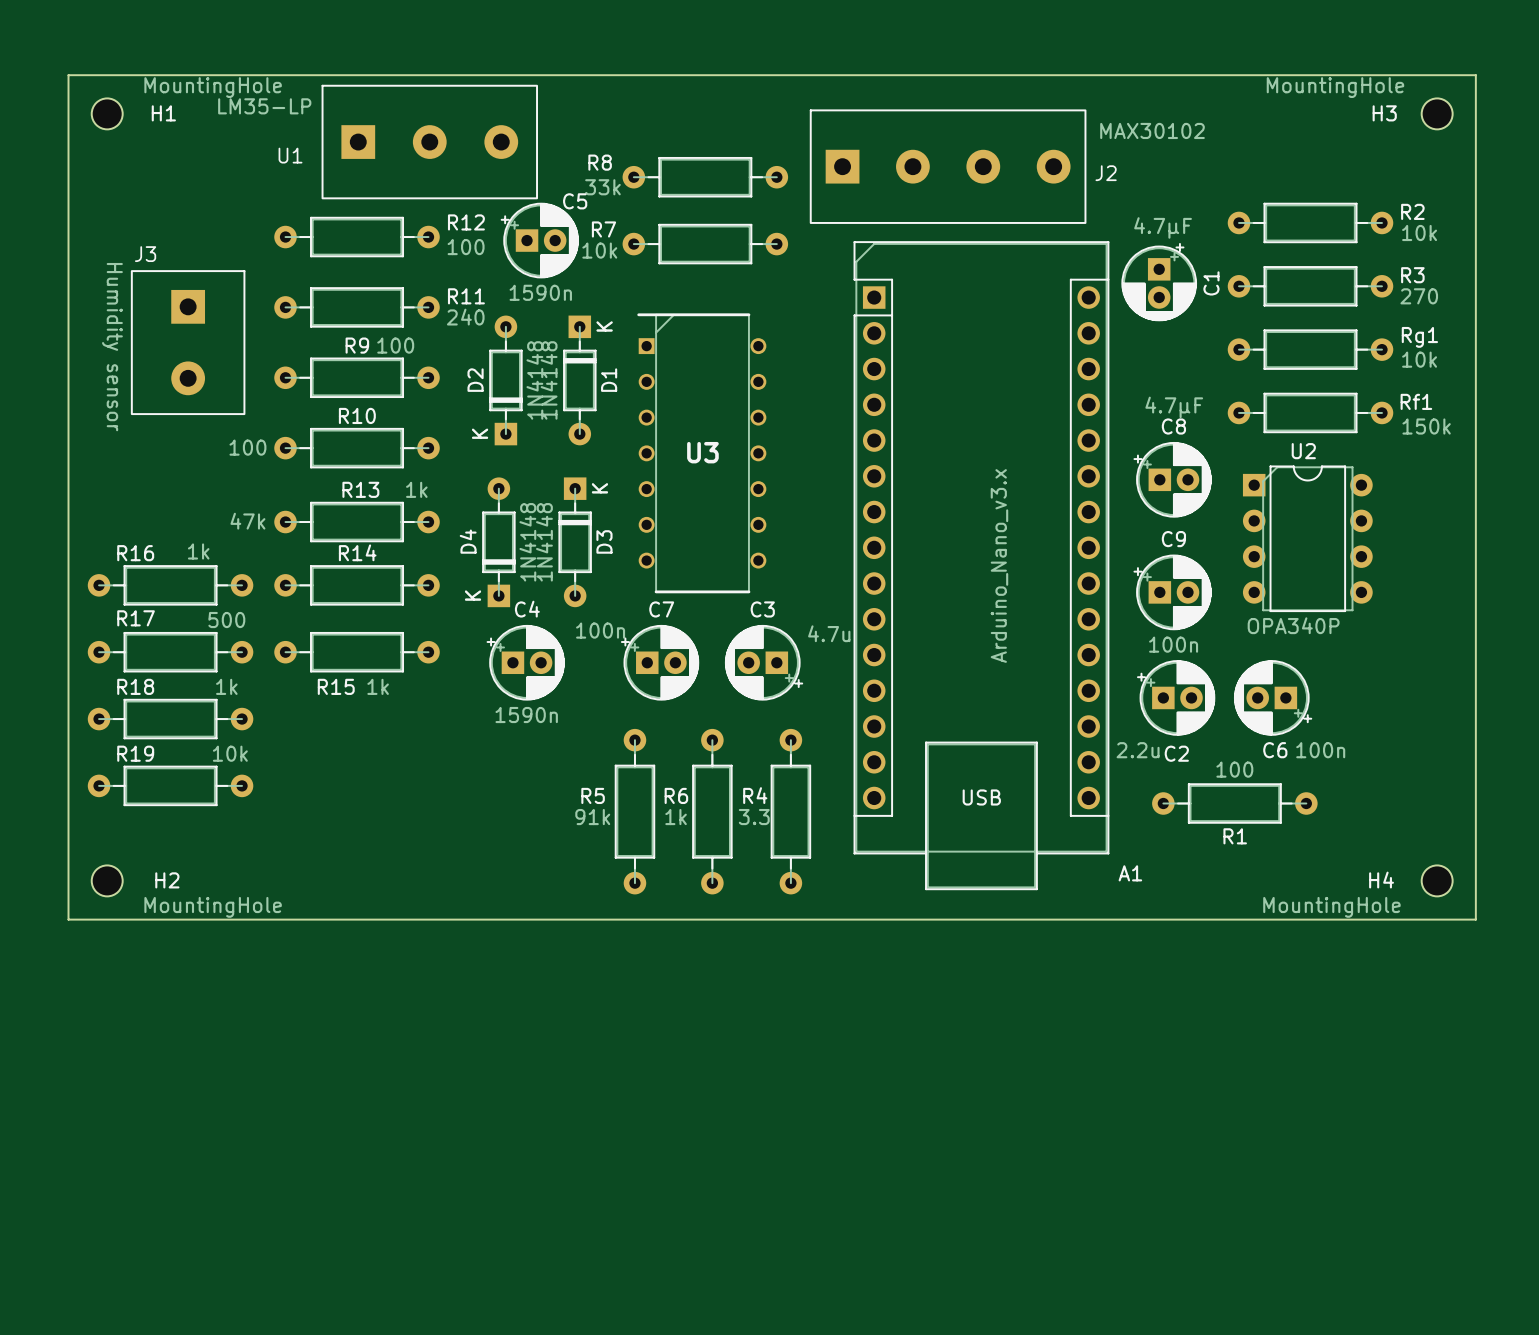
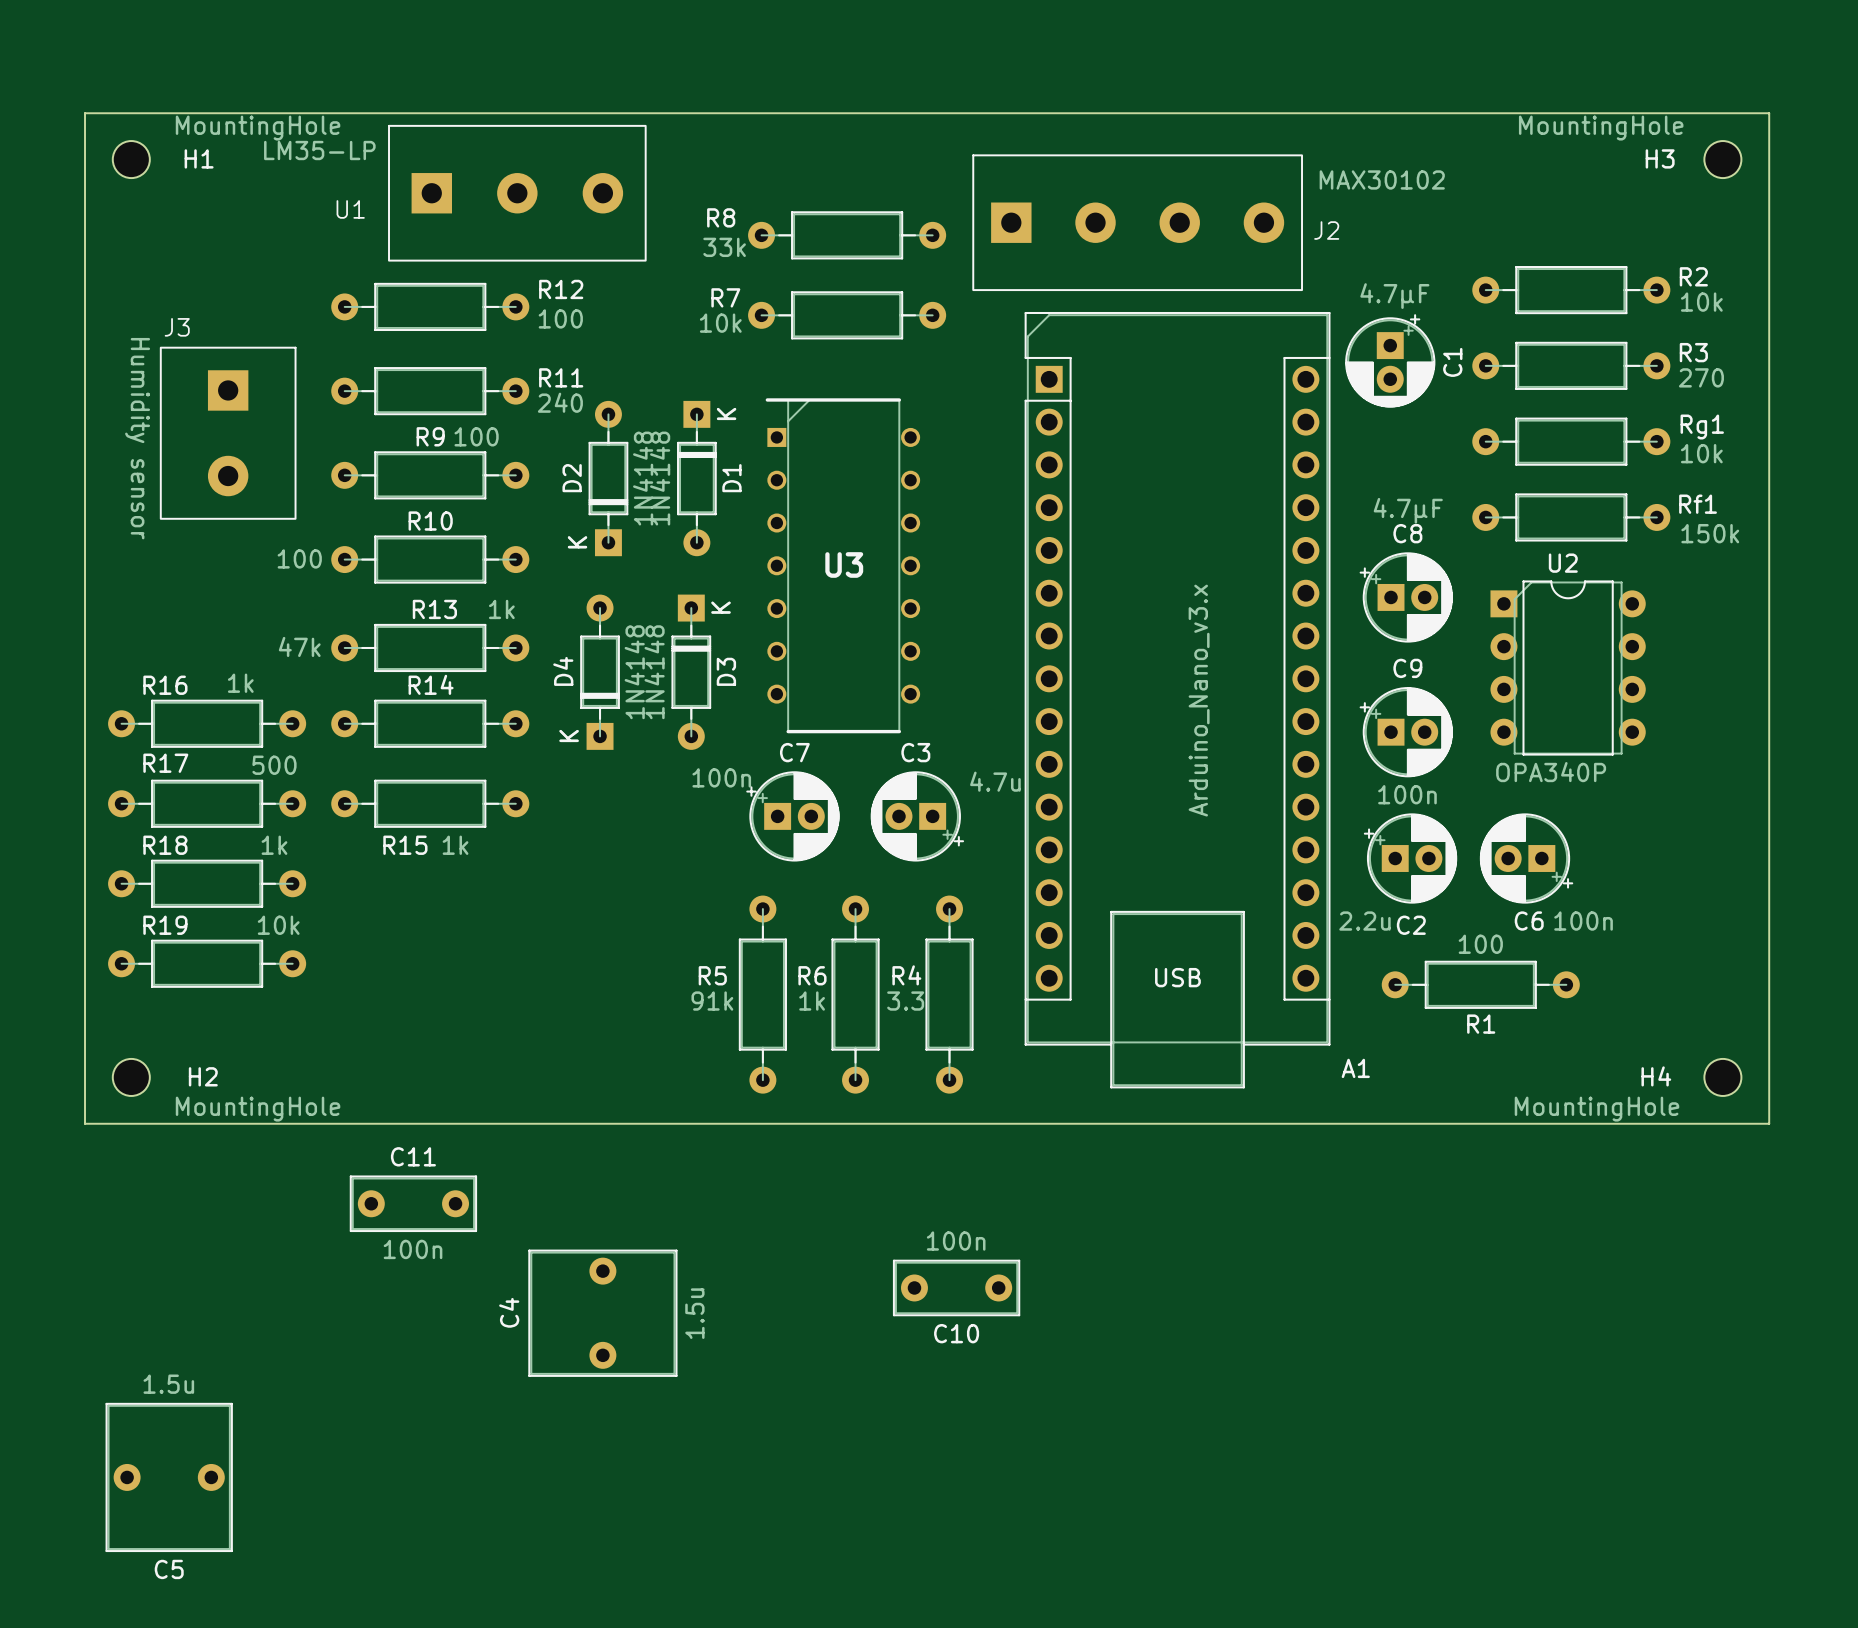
C5 name position: C5 (575, 201) -> C5 (169, 1569)
C5 footprint: [500, 202, 579, 279] -> [105, 1402, 233, 1553]
C5 value: 1590n (540, 292) -> 1.5u (168, 1384)
C4 name position: C4 (527, 609) -> C4 (509, 1312)
C4 footprint: [486, 625, 565, 701] -> [528, 1249, 678, 1377]
C4 value: 1590n (526, 715) -> 1.5u (694, 1313)
C11: none -> 100n (413, 1203)
C10: none -> 100n (956, 1287)

